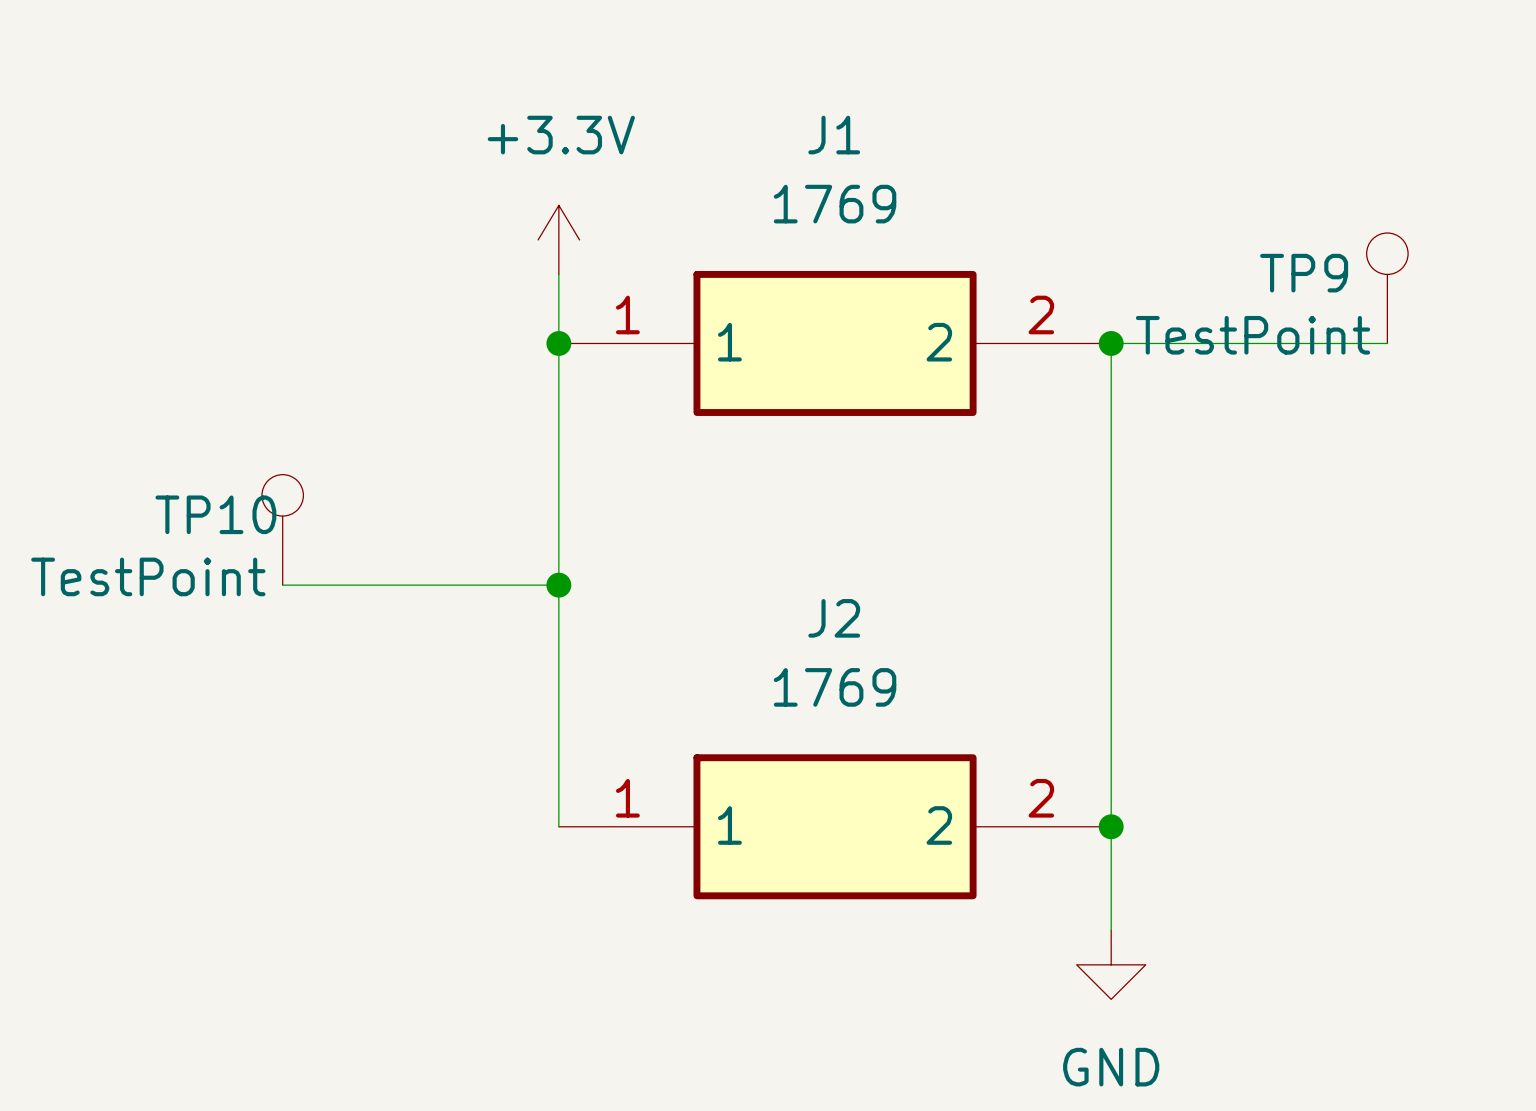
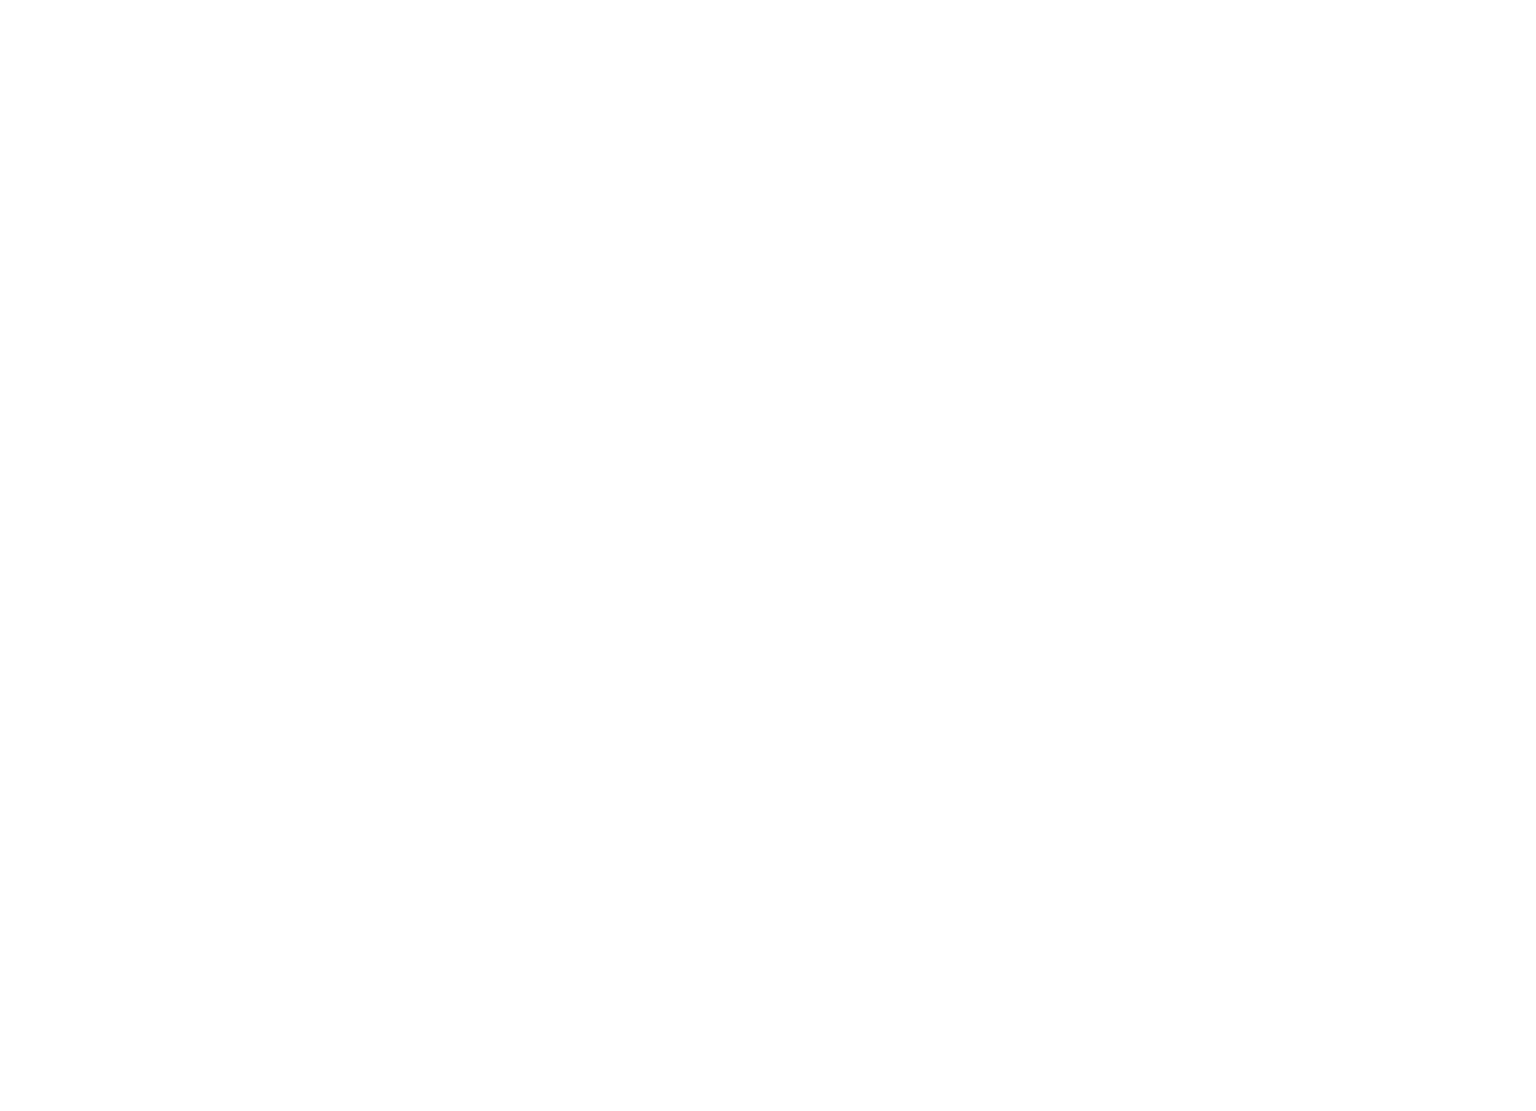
power symbol: +3.3V (558, 239) -> none
wire: (558, 274) (558, 826) -> none
TP9: TestPoint (1387, 288) -> none
junction: (558, 343) -> none
J1: 1769 (835, 343) -> none
junction: (1111, 343) -> none
wire: (1387, 343) (1111, 343) (1111, 930) -> none
TP10: TestPoint (282, 529) -> none
wire: (282, 585) (558, 585) -> none
junction: (558, 585) -> none
J2: 1769 (835, 826) -> none
junction: (1111, 826) -> none
power symbol: GND (1111, 964) -> none

